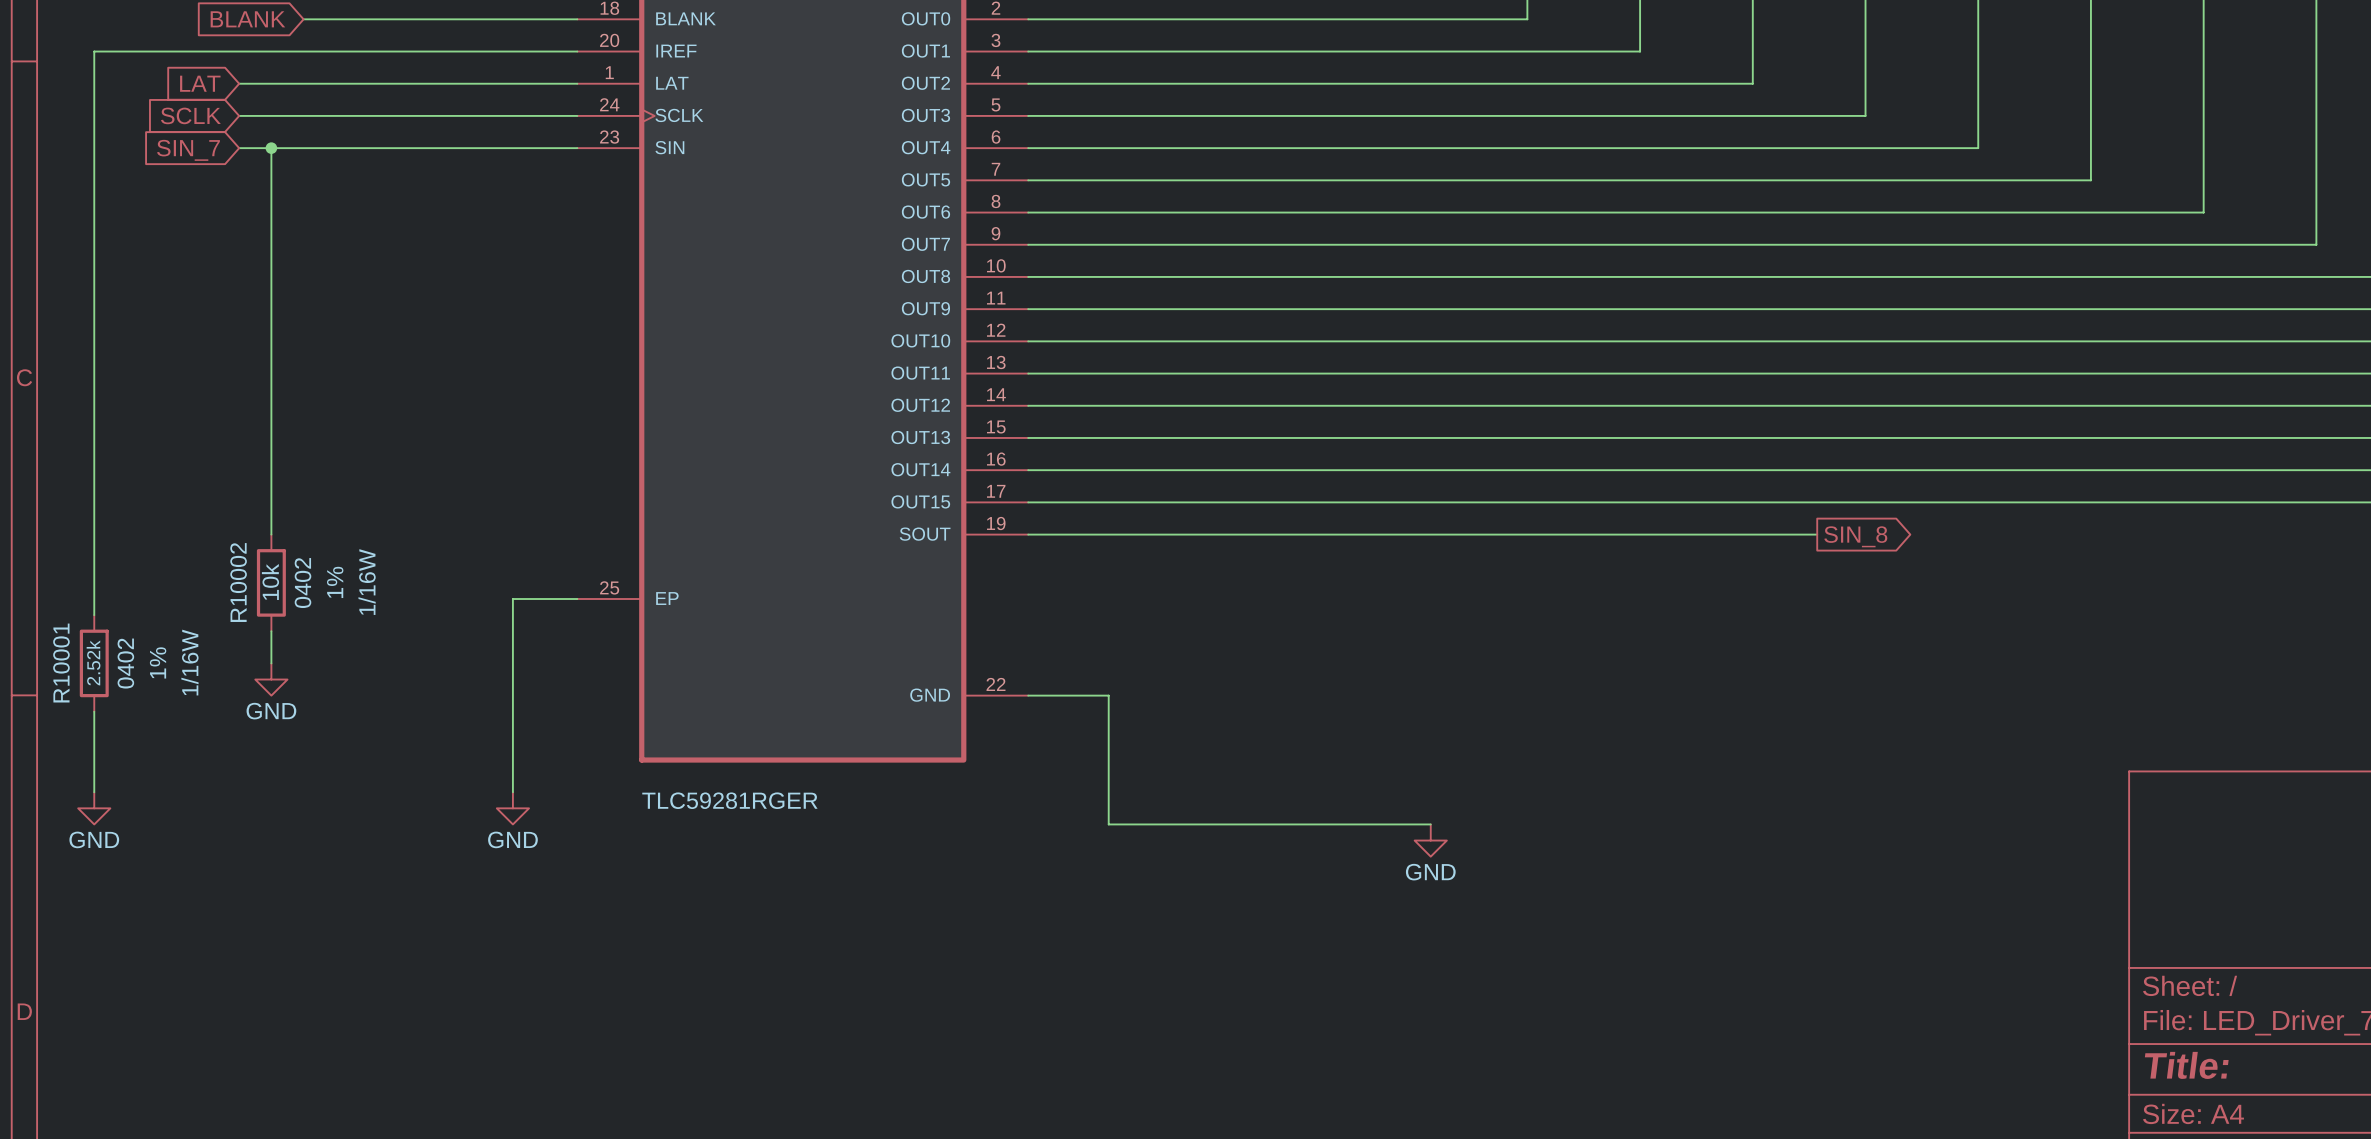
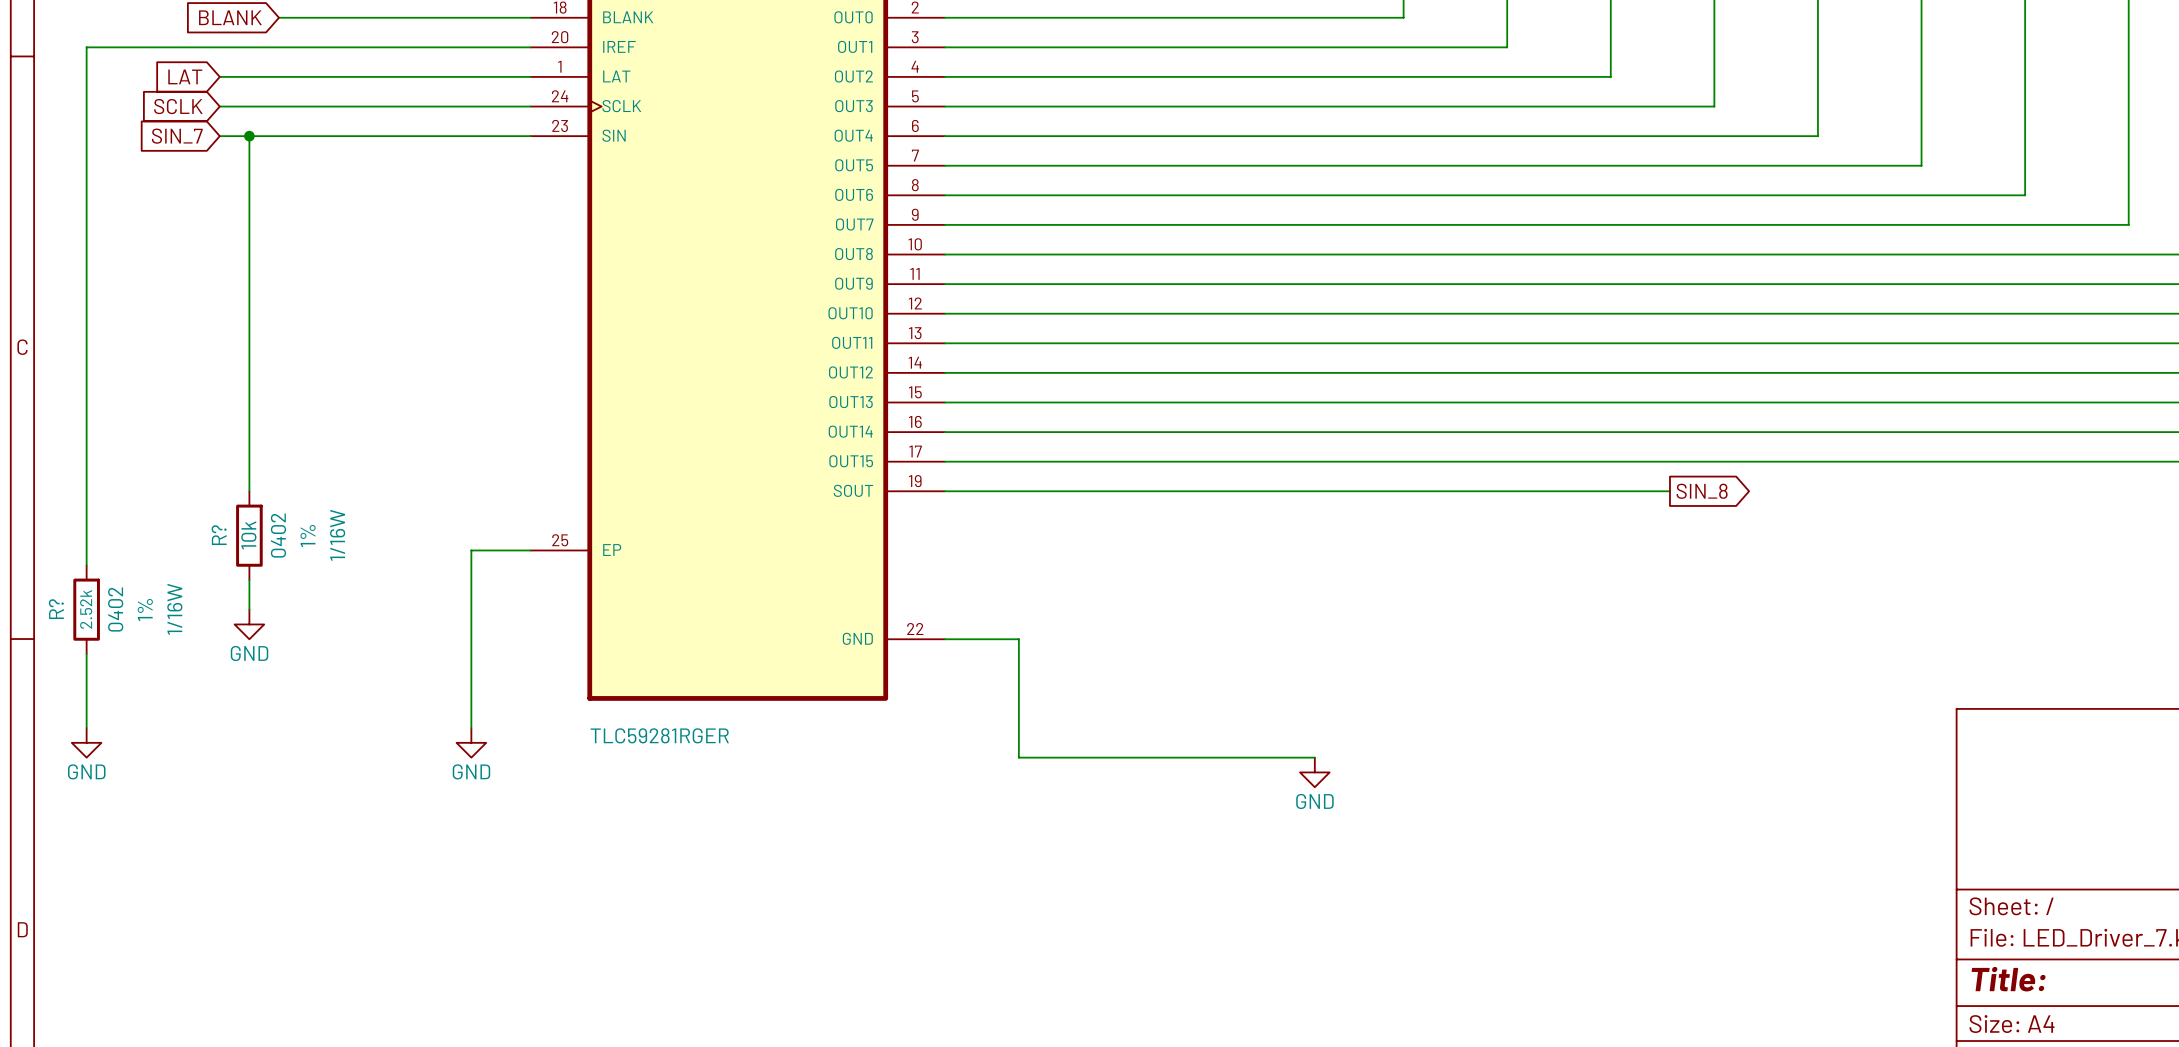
R10002 name: R10002 (238, 582) -> R? (219, 535)
R10001 name: R10001 (61, 663) -> R? (56, 609)

